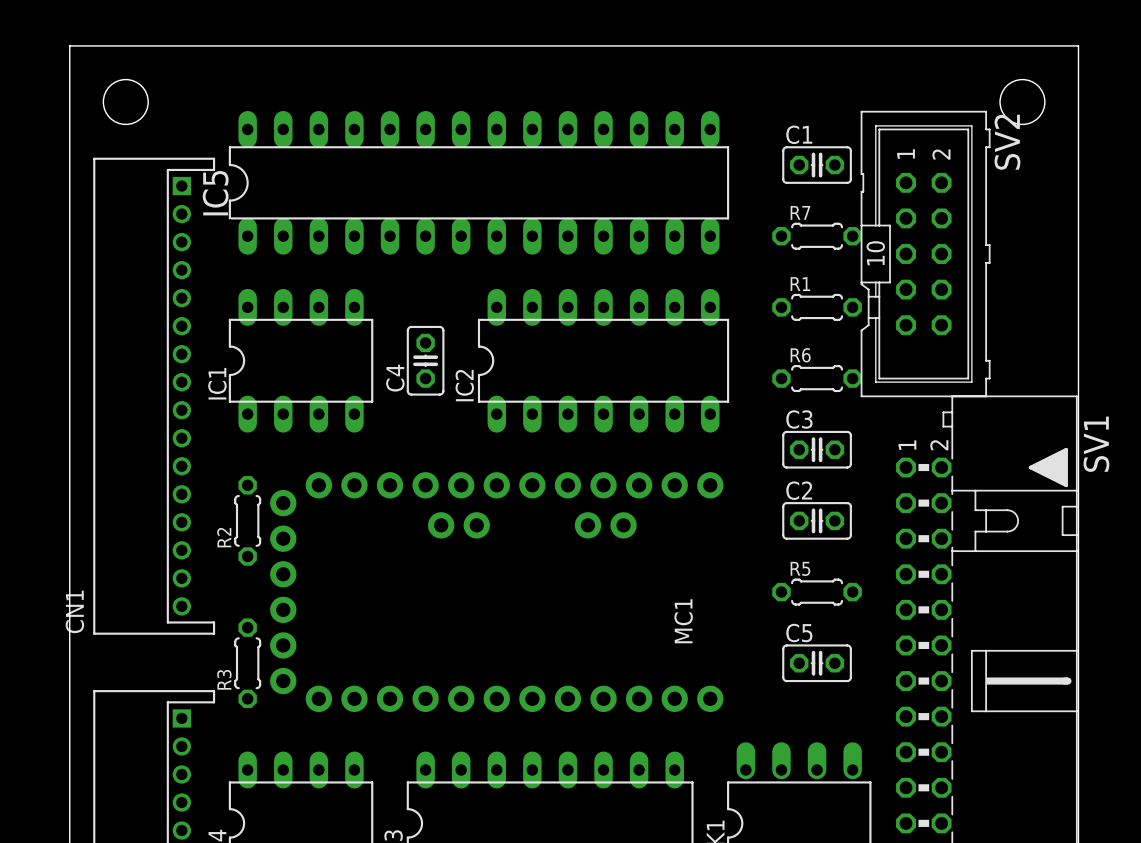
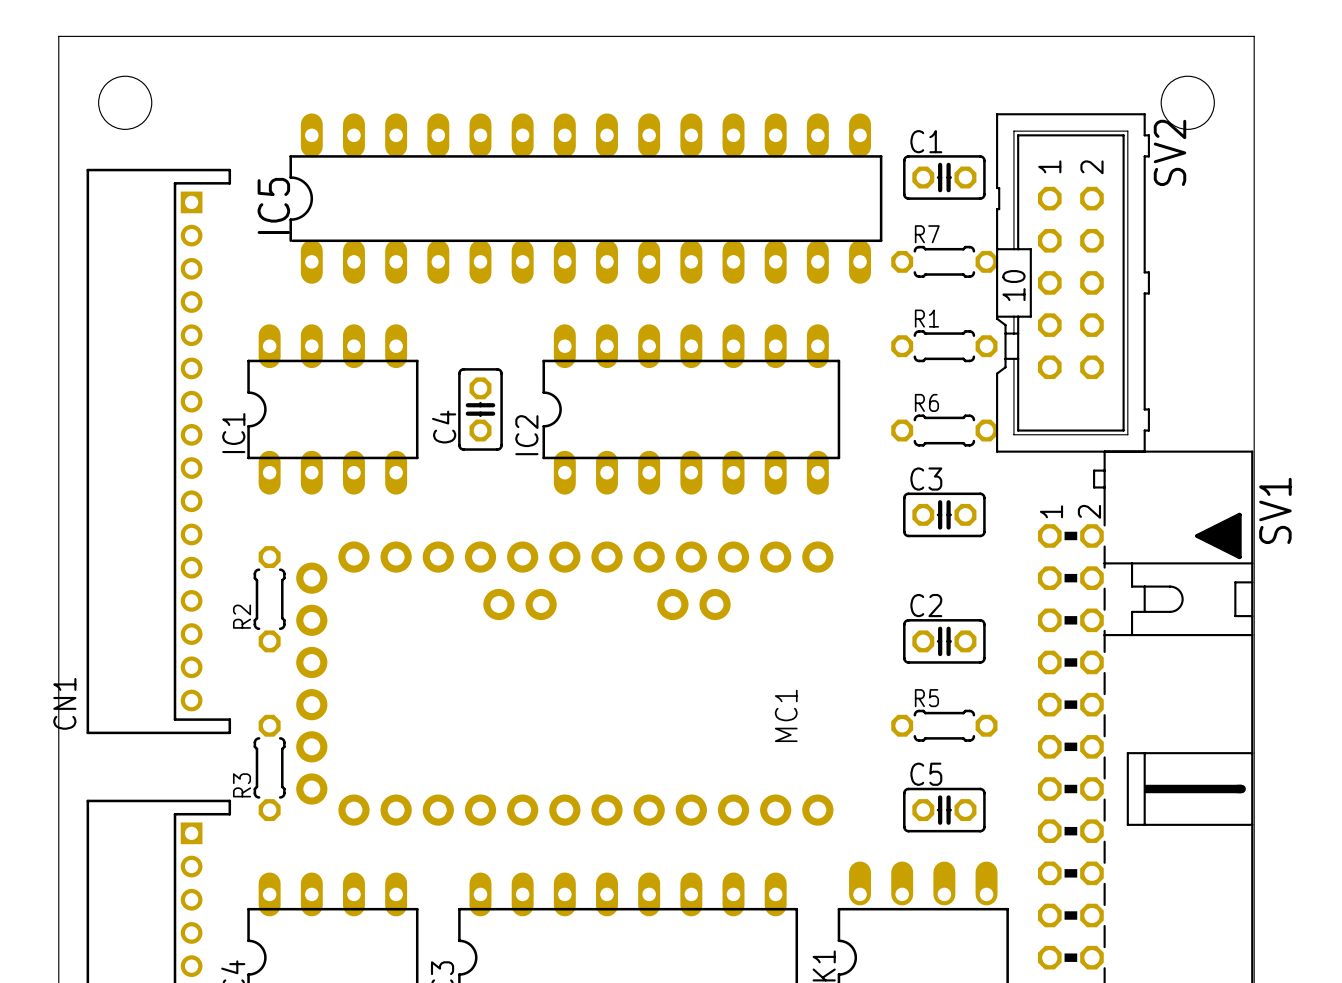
IC5 position: (478, 182) -> (585, 198)
C2 position: (817, 520) -> (944, 641)
R5 position: (817, 592) -> (944, 725)
C5 position: (817, 663) -> (944, 810)

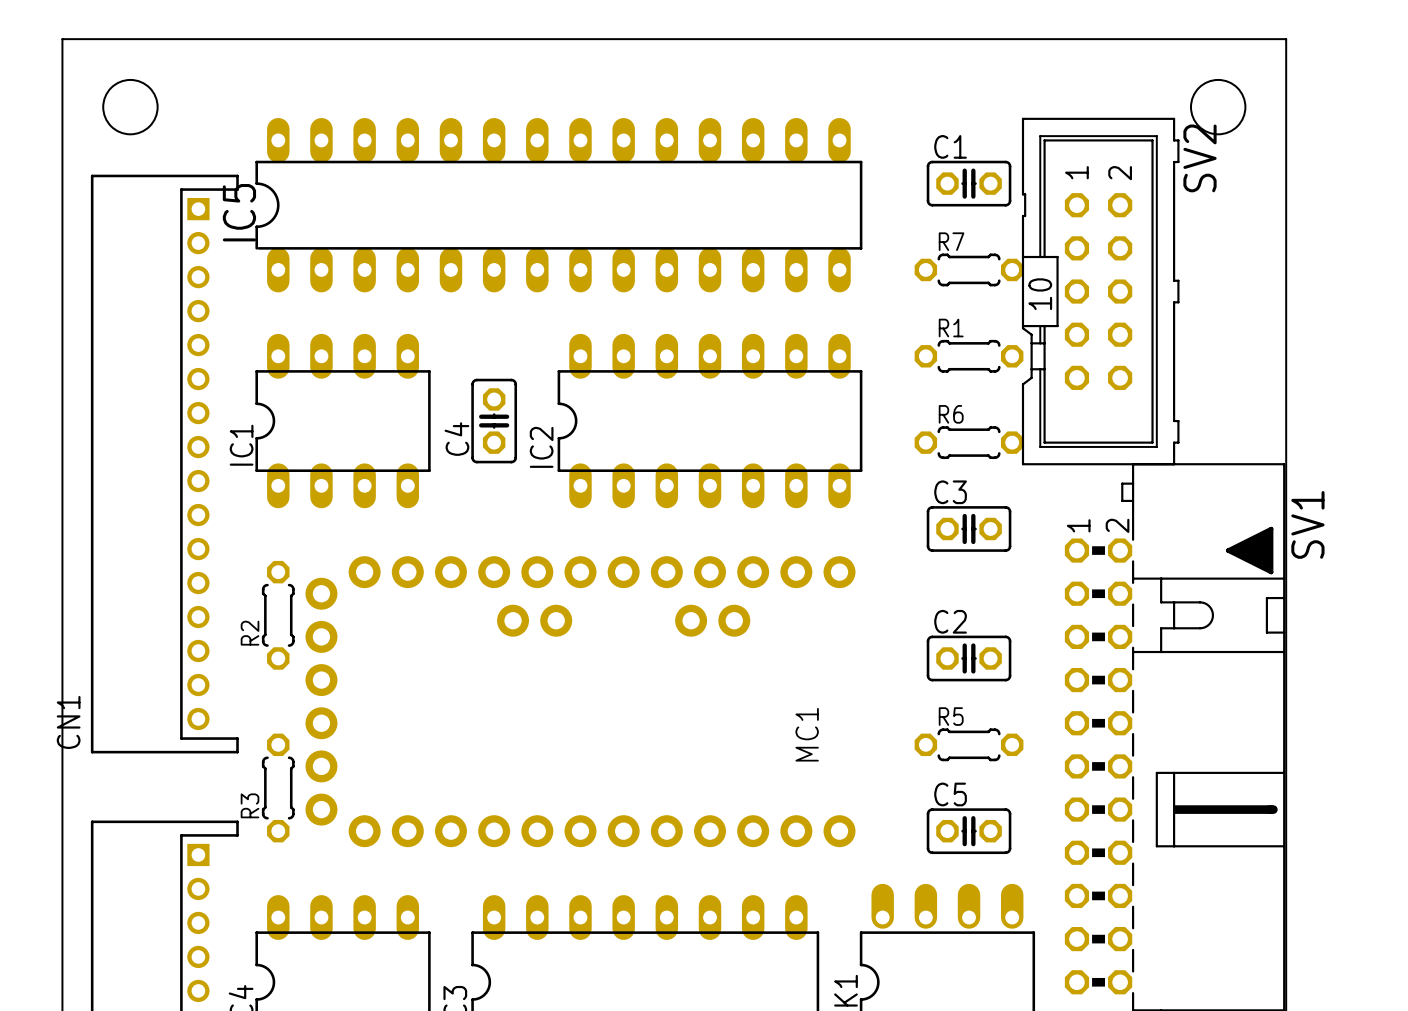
IC5 position: (585, 198) -> (558, 205)

